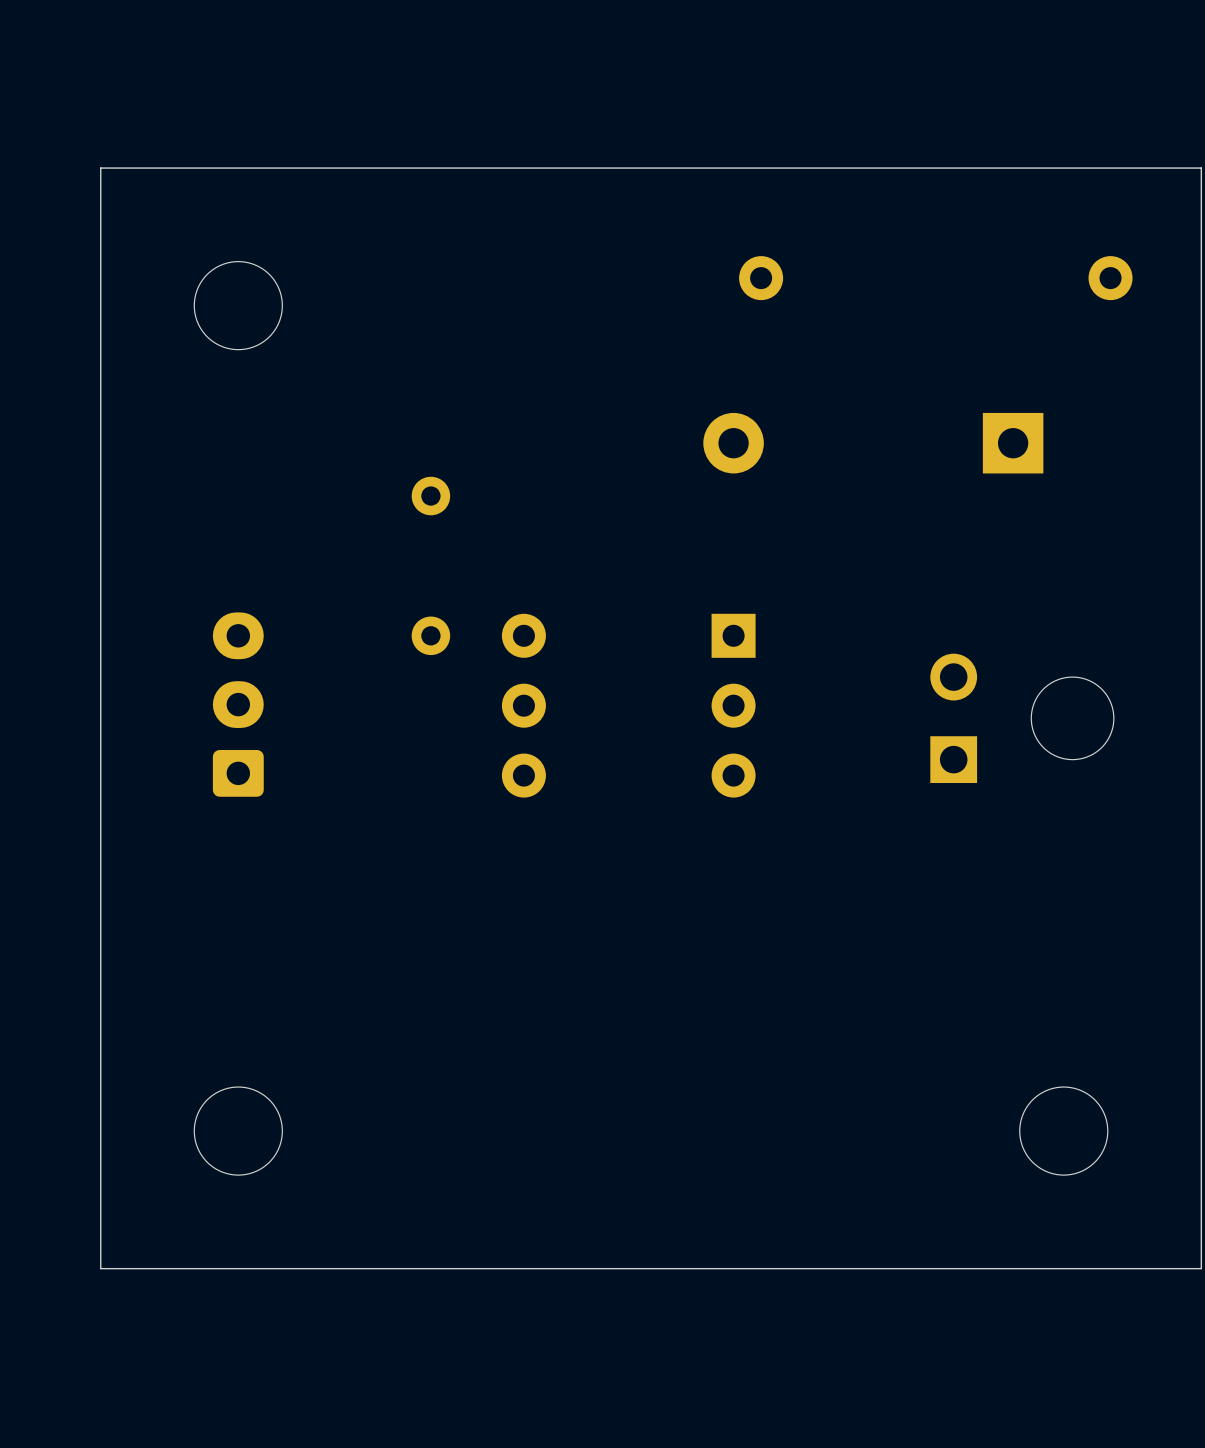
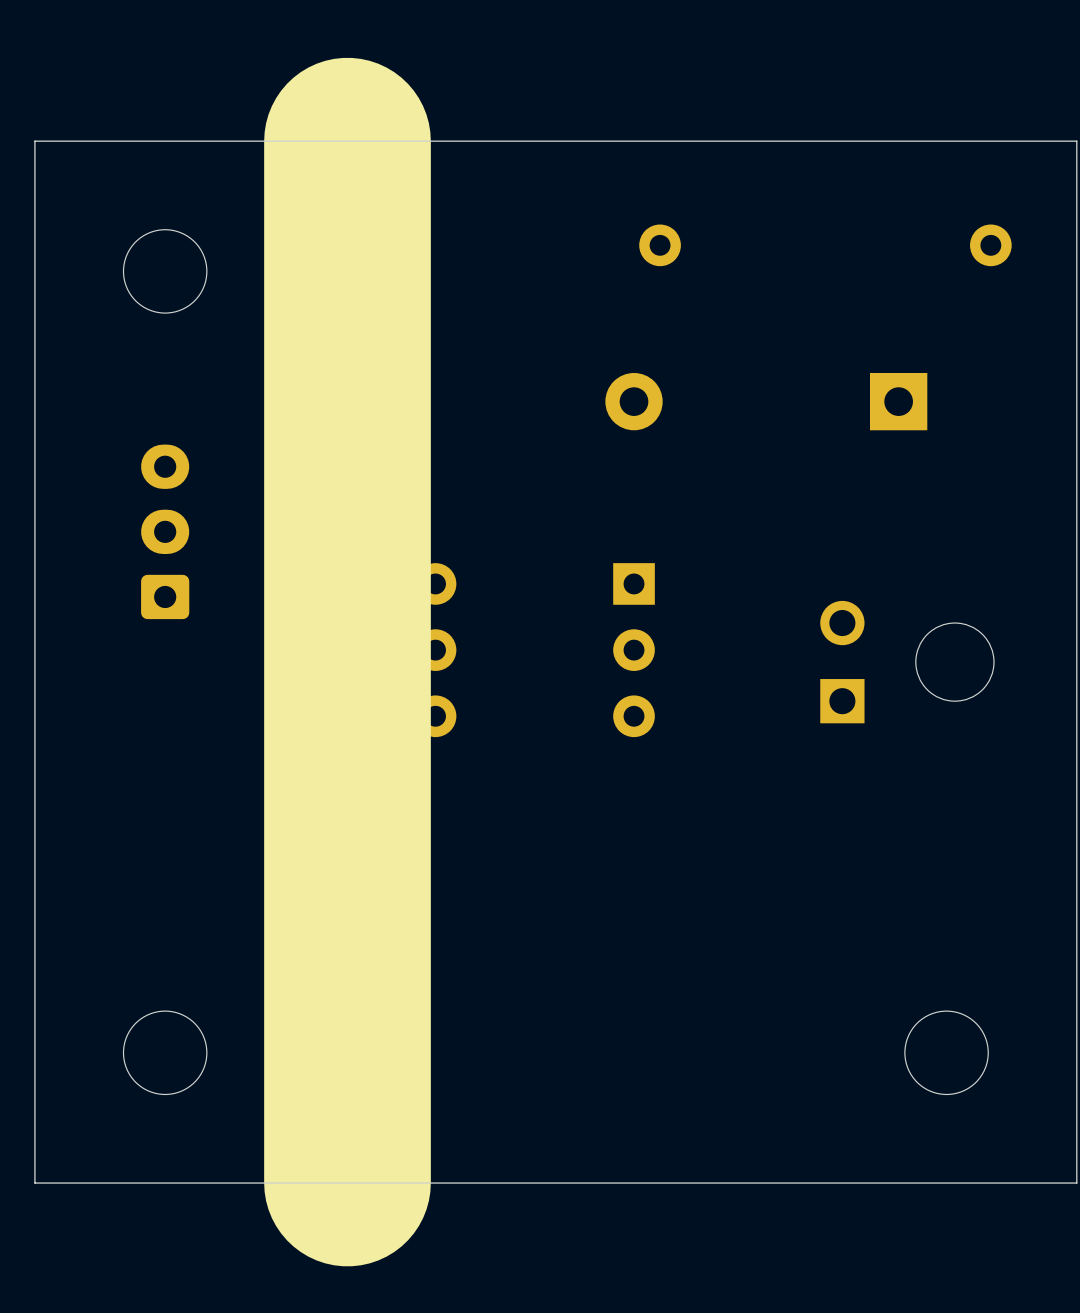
line: none -> (347, 141) (347, 1183)
part position: (238, 704) -> (165, 531)

